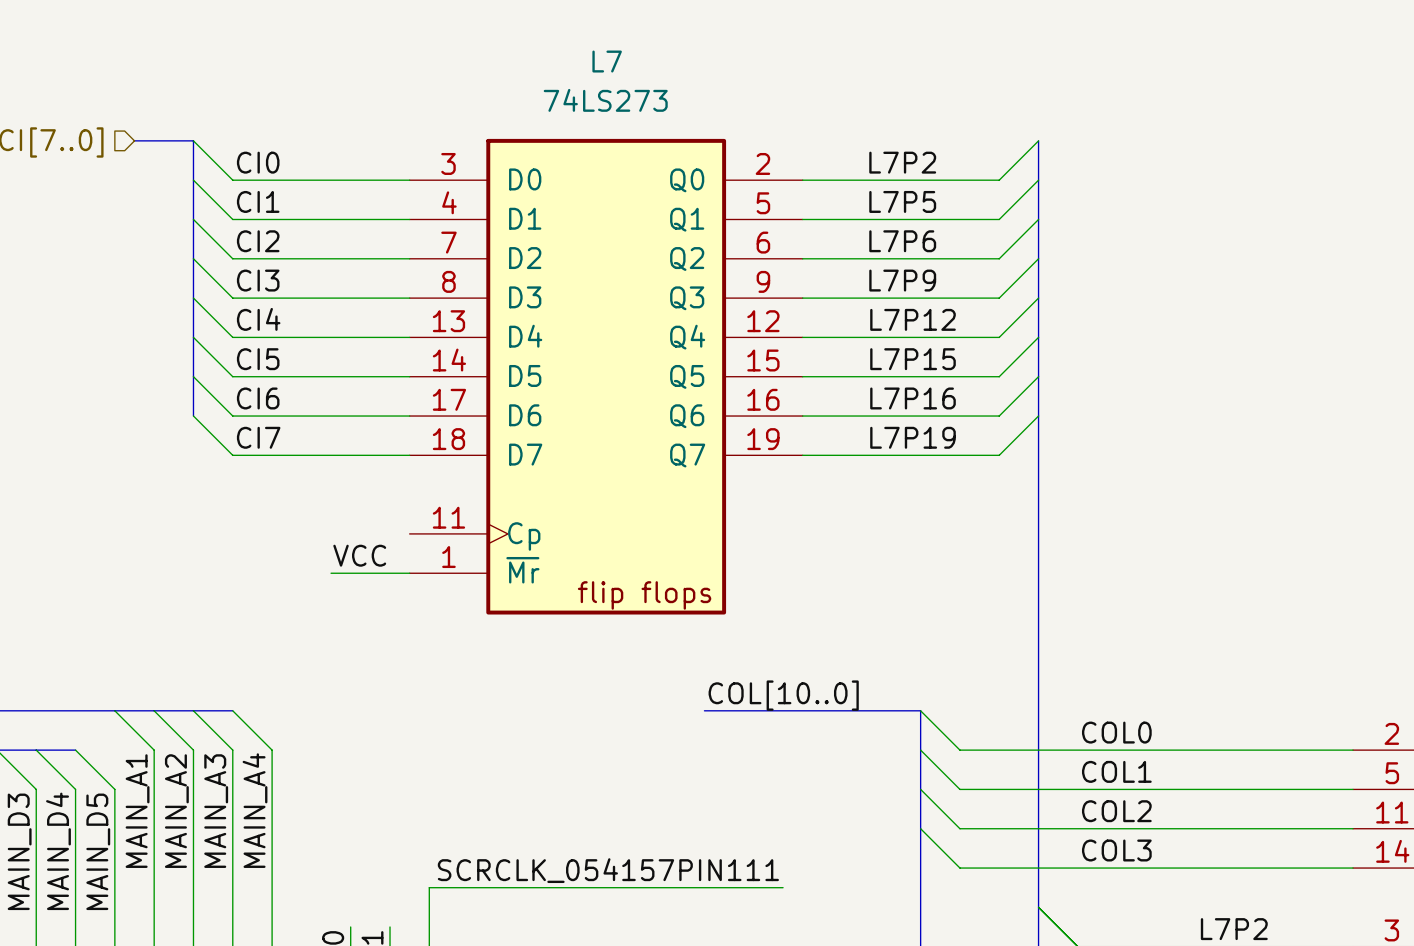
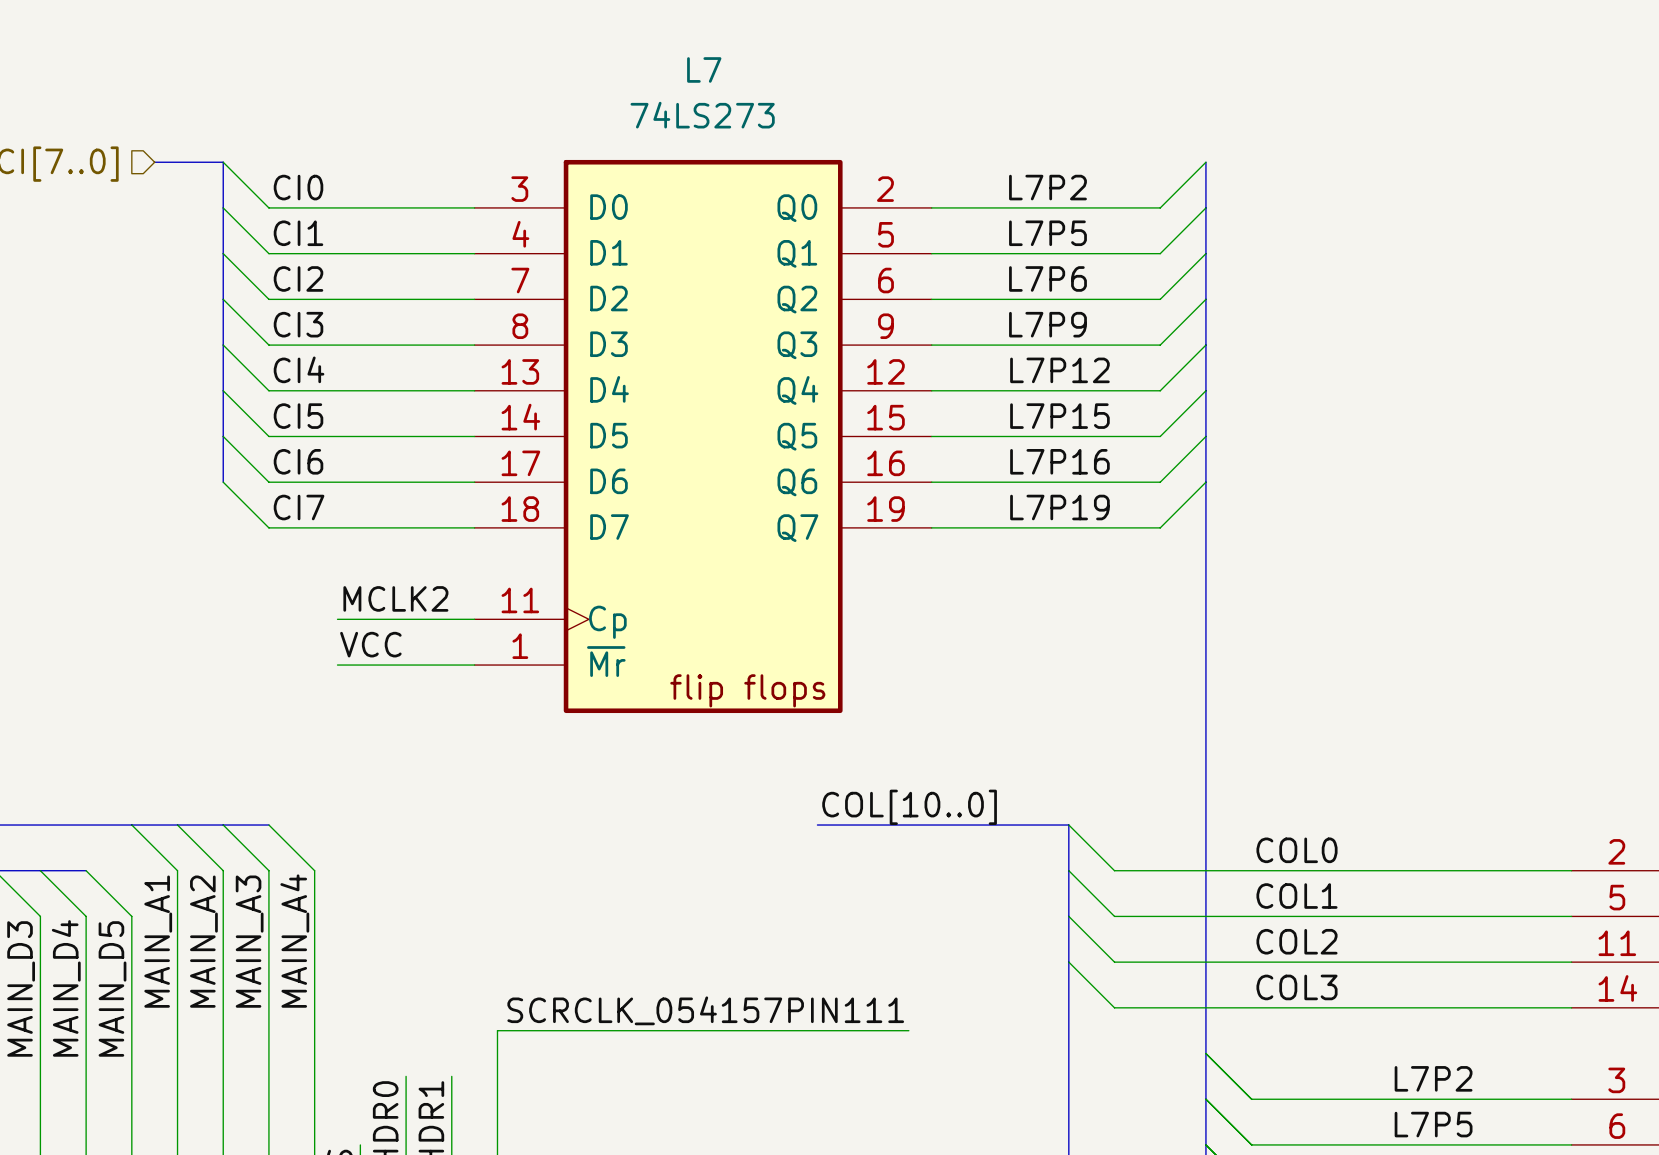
label: none -> MCLK2 (395, 598)
wire: none -> (337, 619) (474, 619)
label position: VCC (359, 555) -> VCC (370, 644)
wire: none -> (337, 665) (383, 665)

